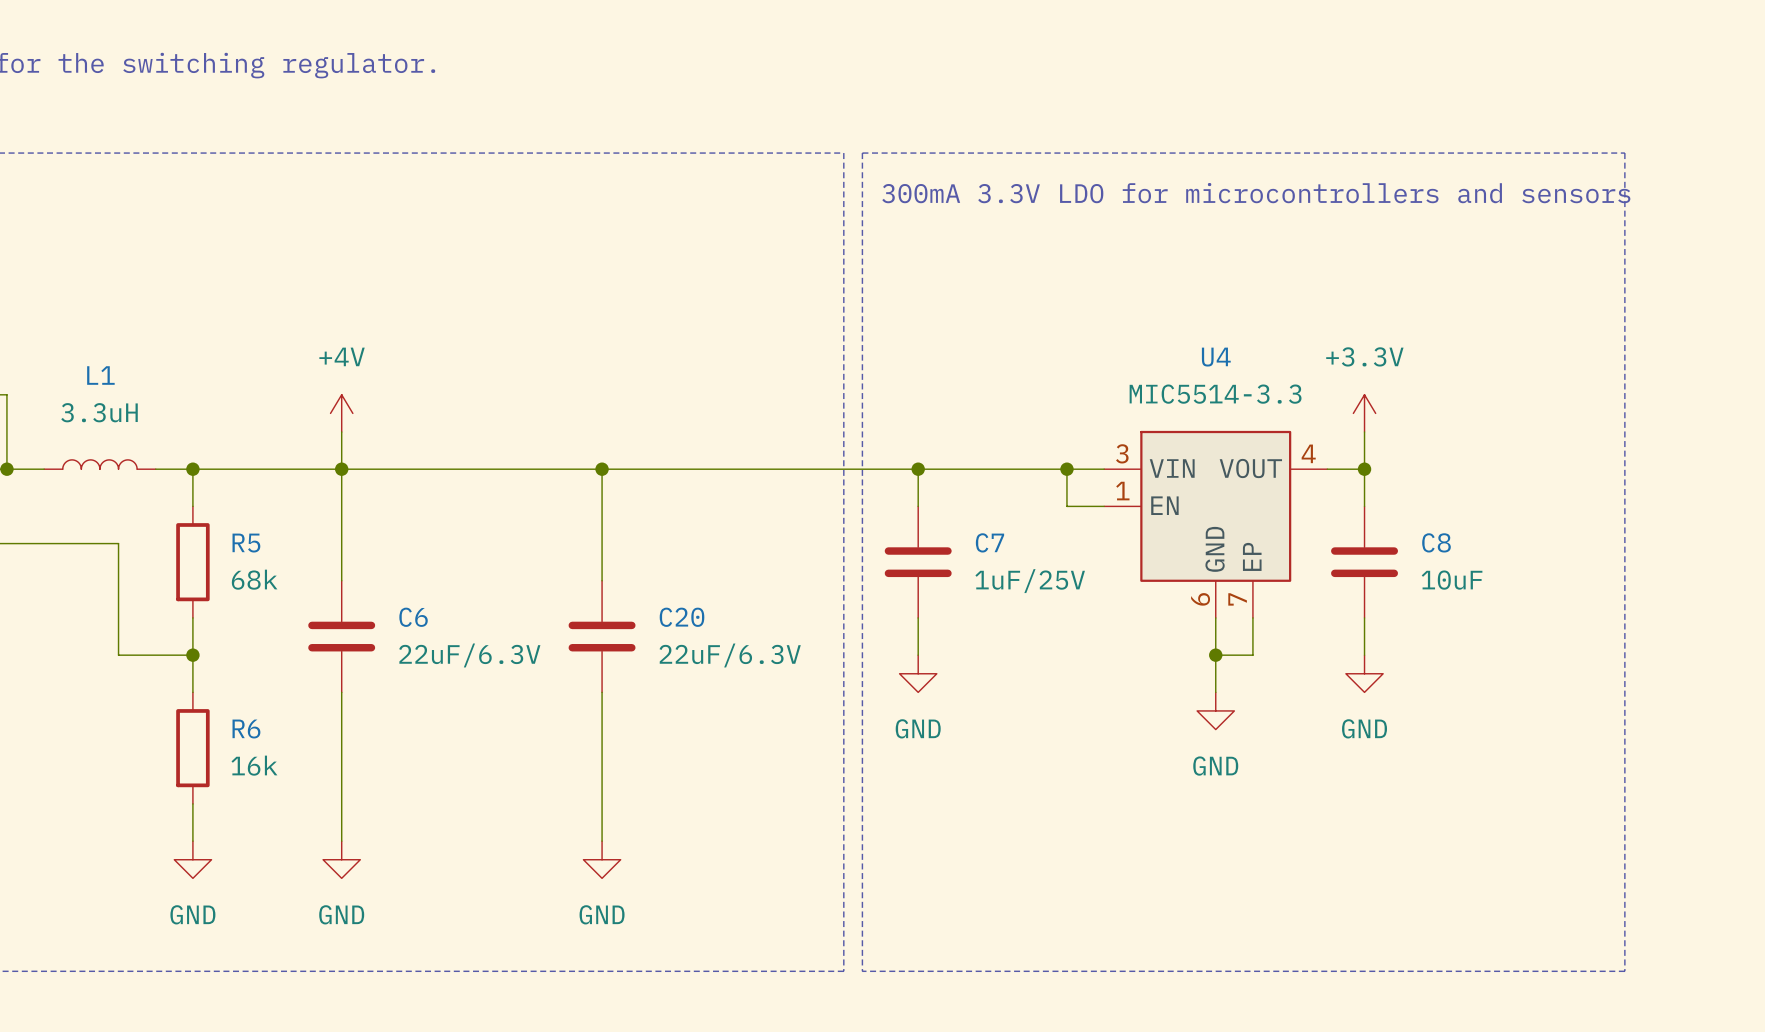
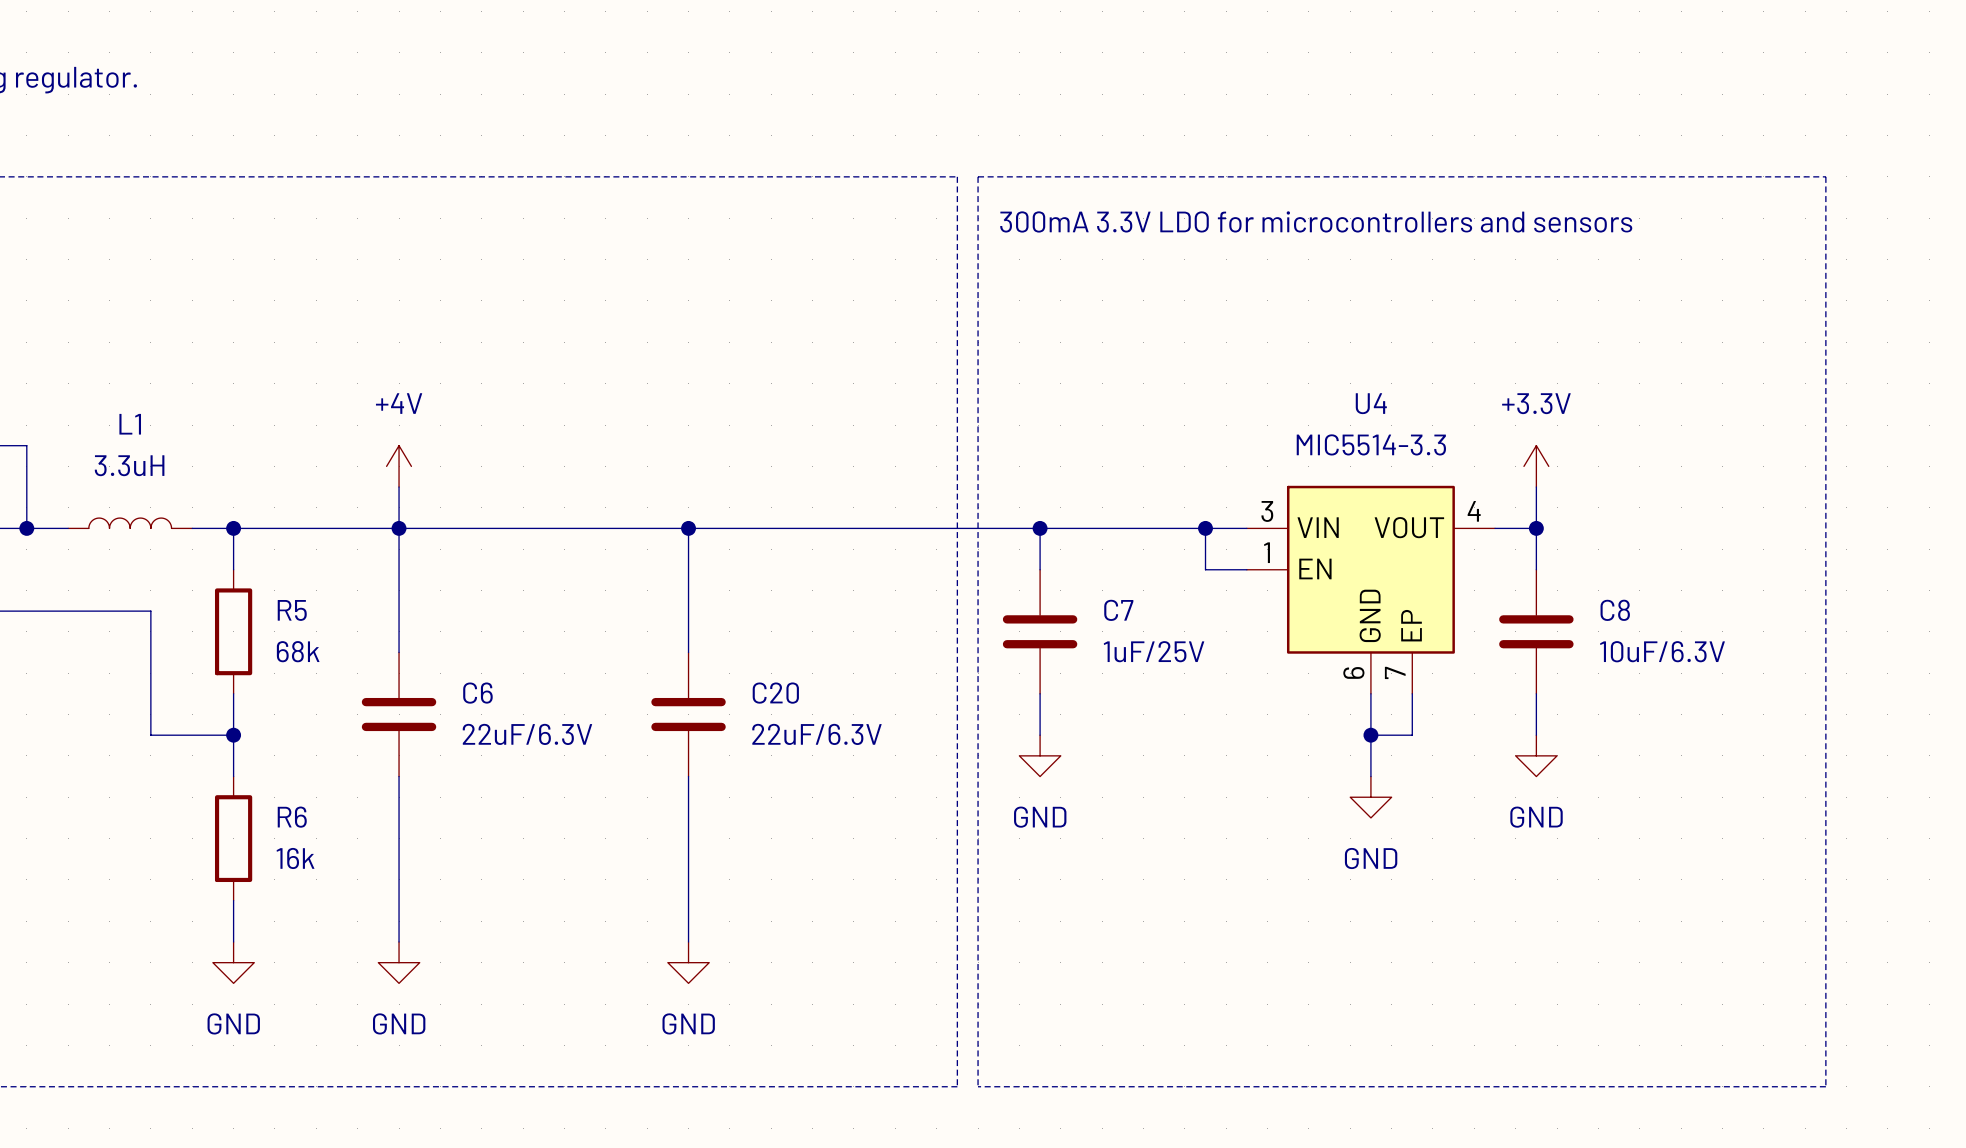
C8 value: 10uF (1452, 580) -> 10uF/6.3V (1662, 651)

